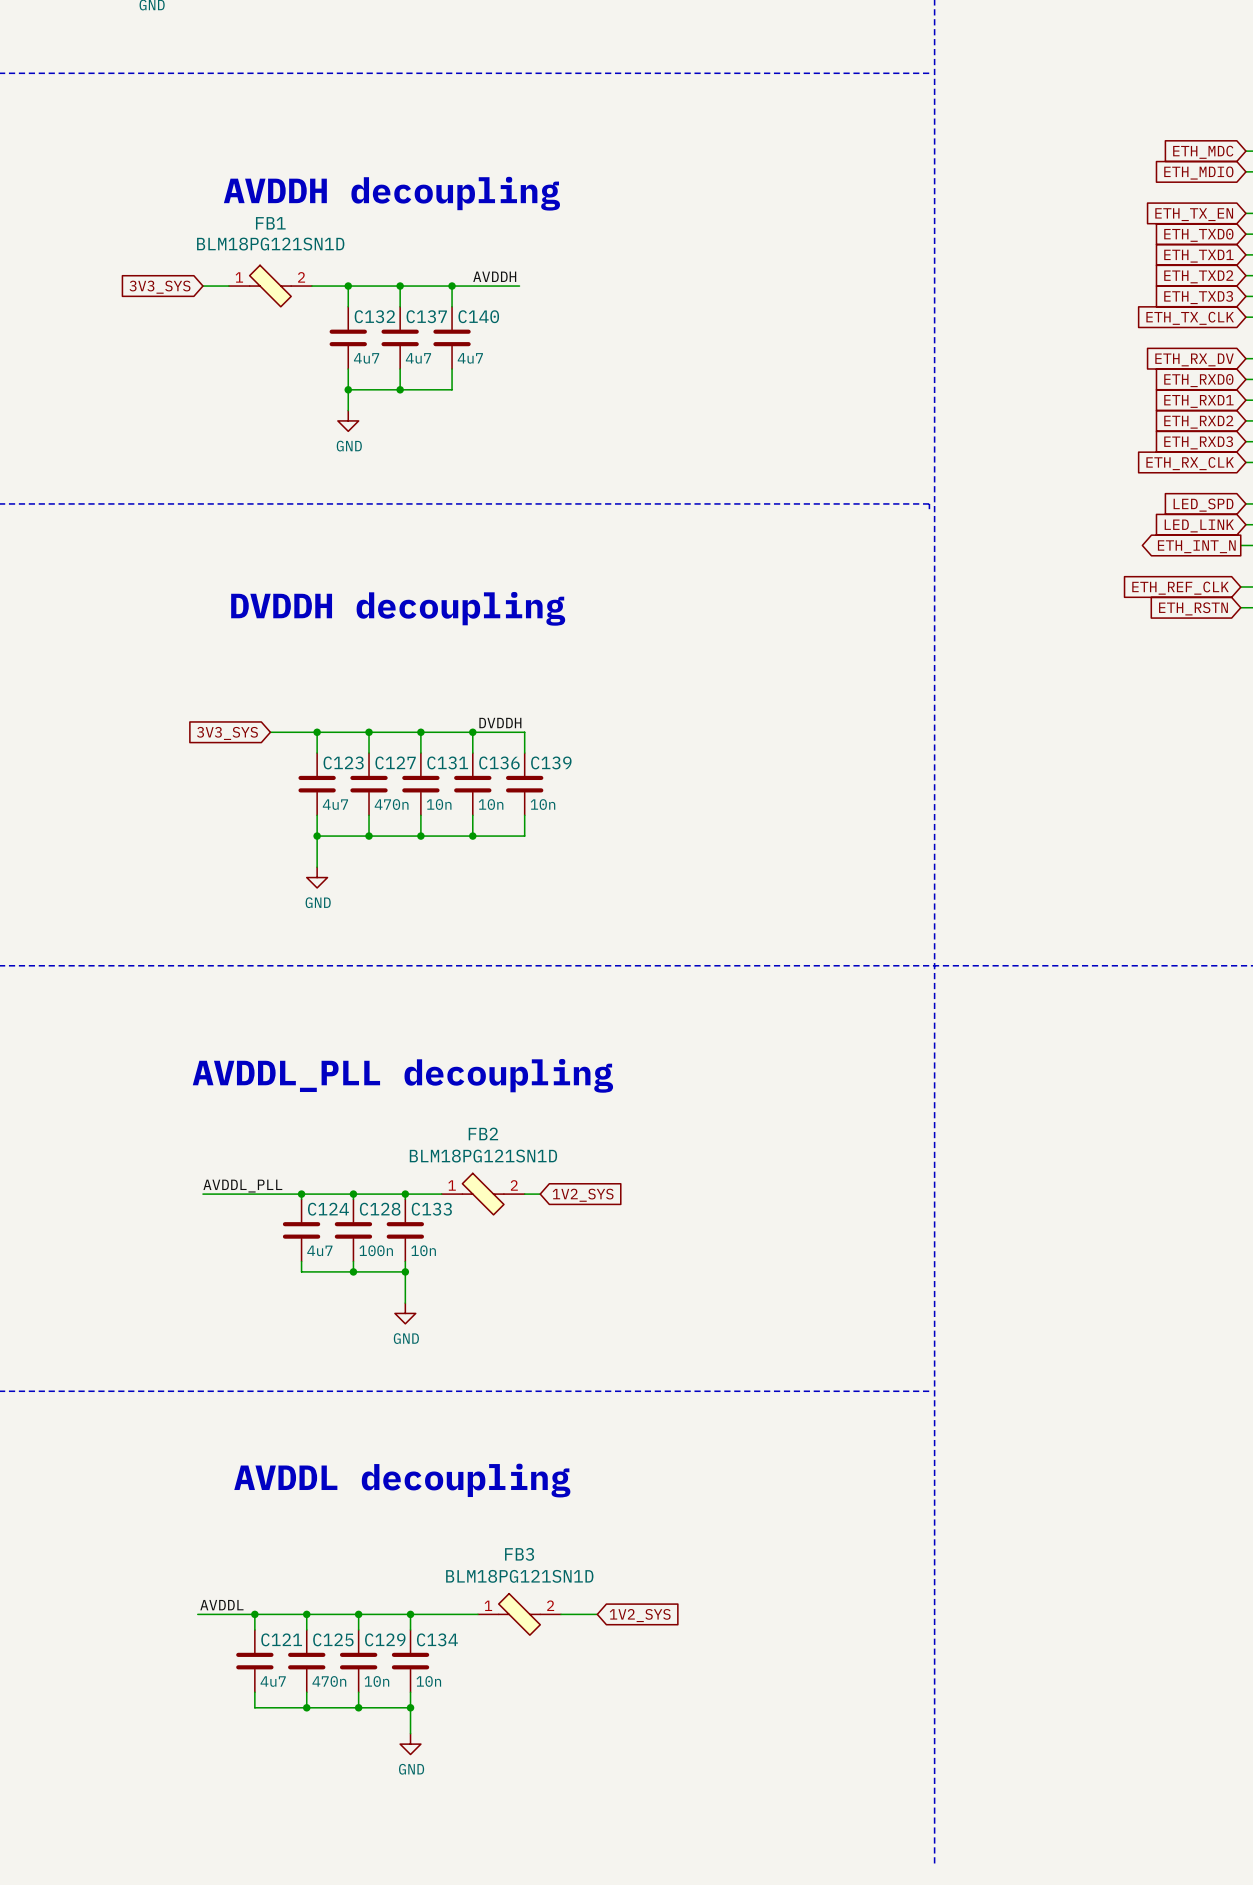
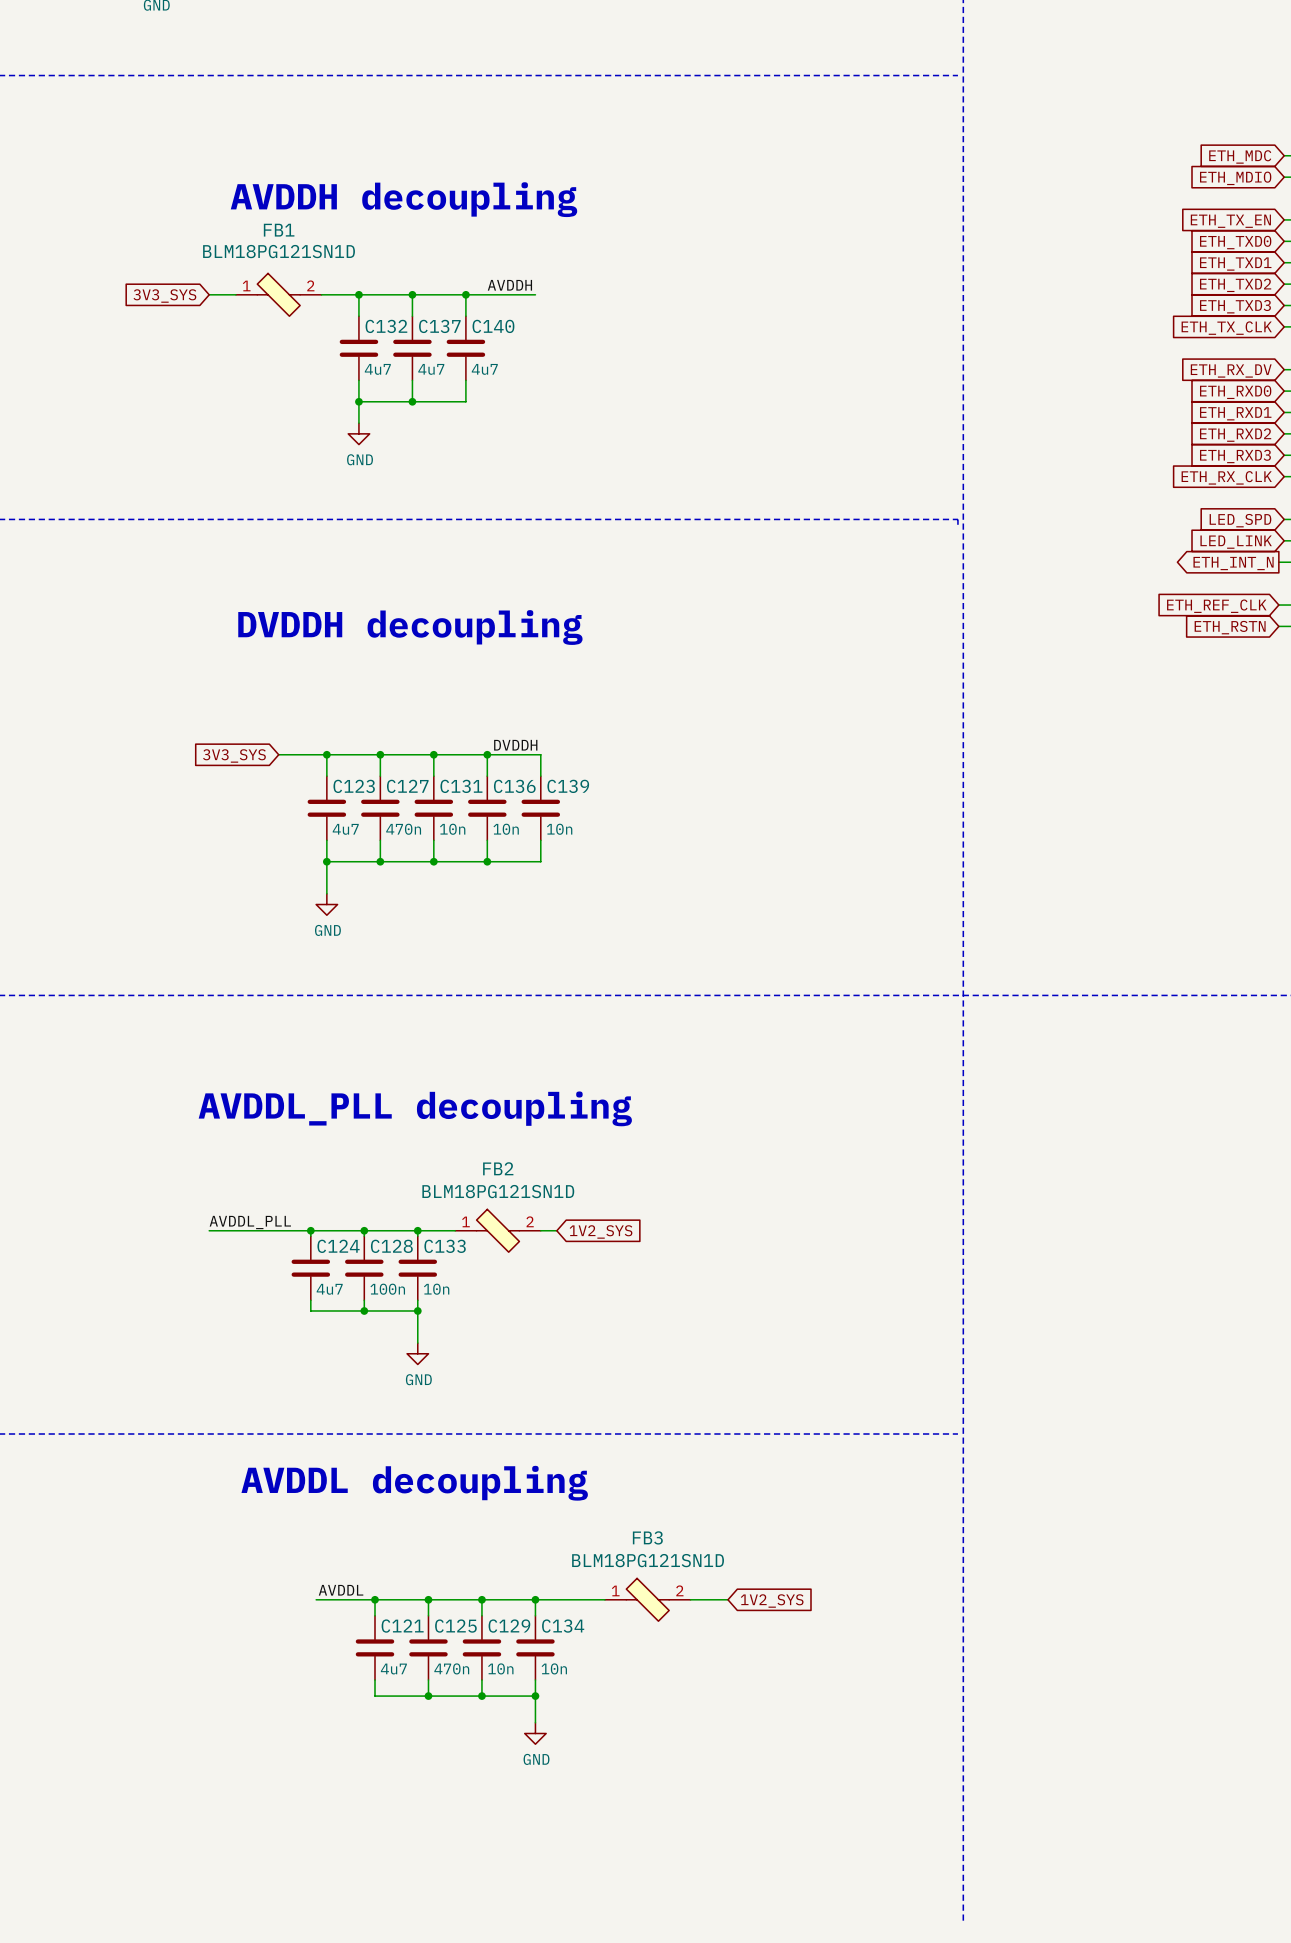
text position: AVDDL decoupling (402, 1480) -> AVDDL decoupling (414, 1483)
junction: none -> (375, 1599)
junction: none -> (428, 1599)
junction: none -> (481, 1599)
junction: none -> (535, 1599)
label position: AVDDL (221, 1605) -> AVDDL (341, 1590)
wire: (197, 1614) (477, 1614) -> (316, 1599) (604, 1599)
wire: (254, 1614) (254, 1629) -> (375, 1599) (375, 1615)
junction: (254, 1614) -> none
wire: (306, 1614) (306, 1629) -> (428, 1599) (428, 1615)
junction: (306, 1614) -> none
wire: (358, 1614) (358, 1629) -> (481, 1599) (481, 1615)
junction: (358, 1614) -> none
wire: (410, 1614) (410, 1629) -> (535, 1599) (535, 1615)
junction: (410, 1614) -> none
FB3 position: (519, 1614) -> (647, 1599)
wire: (561, 1614) (597, 1614) -> (690, 1599) (727, 1599)
global label position: 1V2_SYS (640, 1615) -> 1V2_SYS (772, 1601)
junction: none -> (428, 1696)
junction: none -> (481, 1696)
junction: none -> (535, 1696)
C121 position: (254, 1661) -> (375, 1647)
C125 position: (306, 1661) -> (428, 1647)
C129 position: (358, 1661) -> (481, 1647)
C134 position: (410, 1661) -> (535, 1647)
wire: (254, 1692) (254, 1707) (410, 1707) -> (375, 1680) (375, 1696) (535, 1696)
wire: (306, 1692) (306, 1707) -> (428, 1680) (428, 1696)
wire: (358, 1692) (358, 1707) -> (481, 1680) (481, 1696)
wire: (410, 1692) (410, 1733) -> (535, 1680) (535, 1722)
junction: (306, 1707) -> none
junction: (358, 1707) -> none
junction: (410, 1707) -> none
power symbol position: GND (410, 1744) -> GND (535, 1733)

